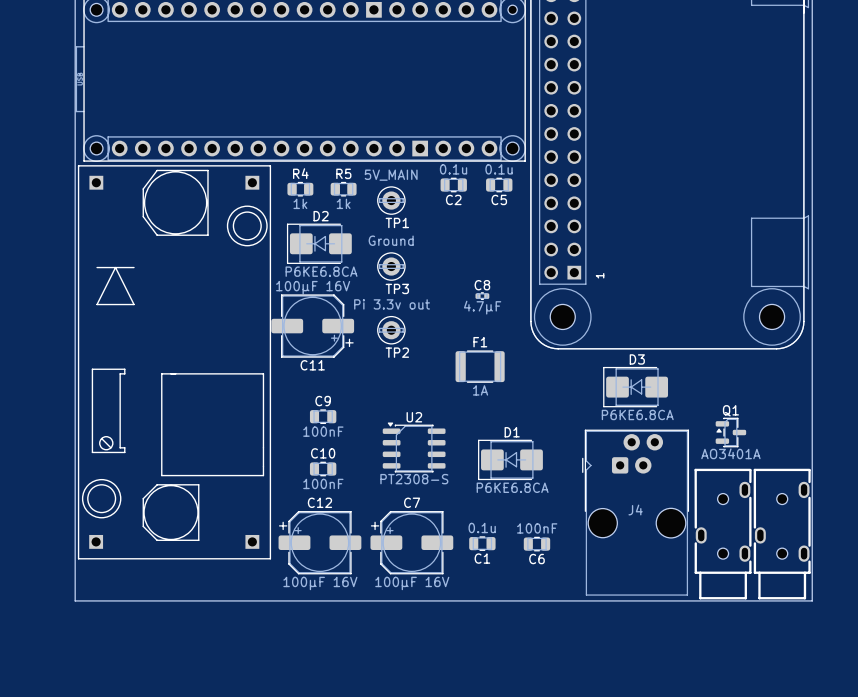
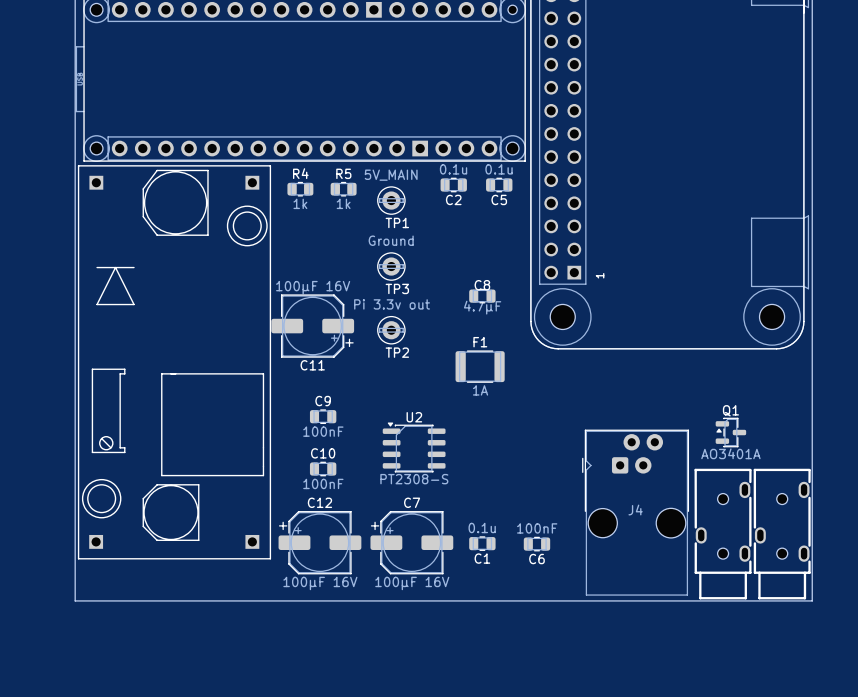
D2: P6KE6.8CA (319, 243) -> none
C8 footprint: [475, 292, 490, 300] -> [469, 288, 496, 304]
D3: P6KE6.8CA (635, 387) -> none
D1: P6KE6.8CA (510, 459) -> none

